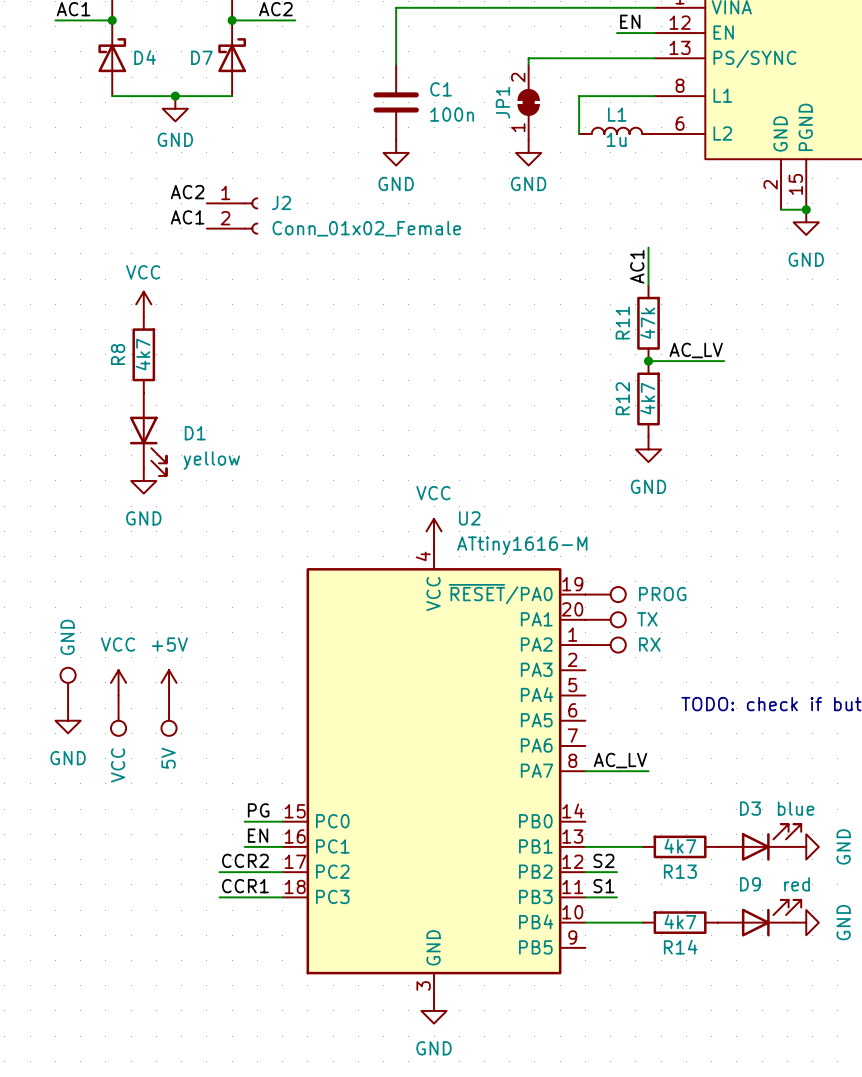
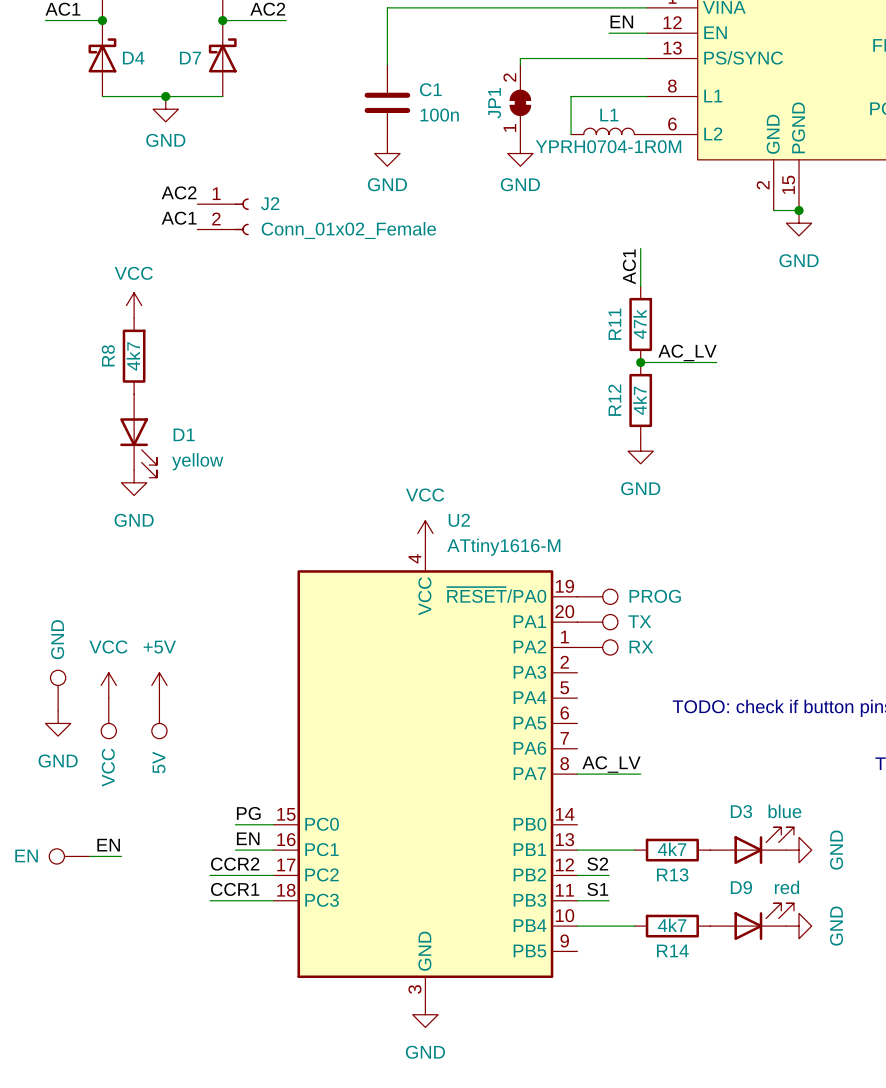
L1 value: 1u (616, 139) -> YPRH0704-1R0M (608, 146)
label: none -> EN (108, 845)
part: none -> EN (69, 856)
wire: none -> (89, 856) (121, 856)

